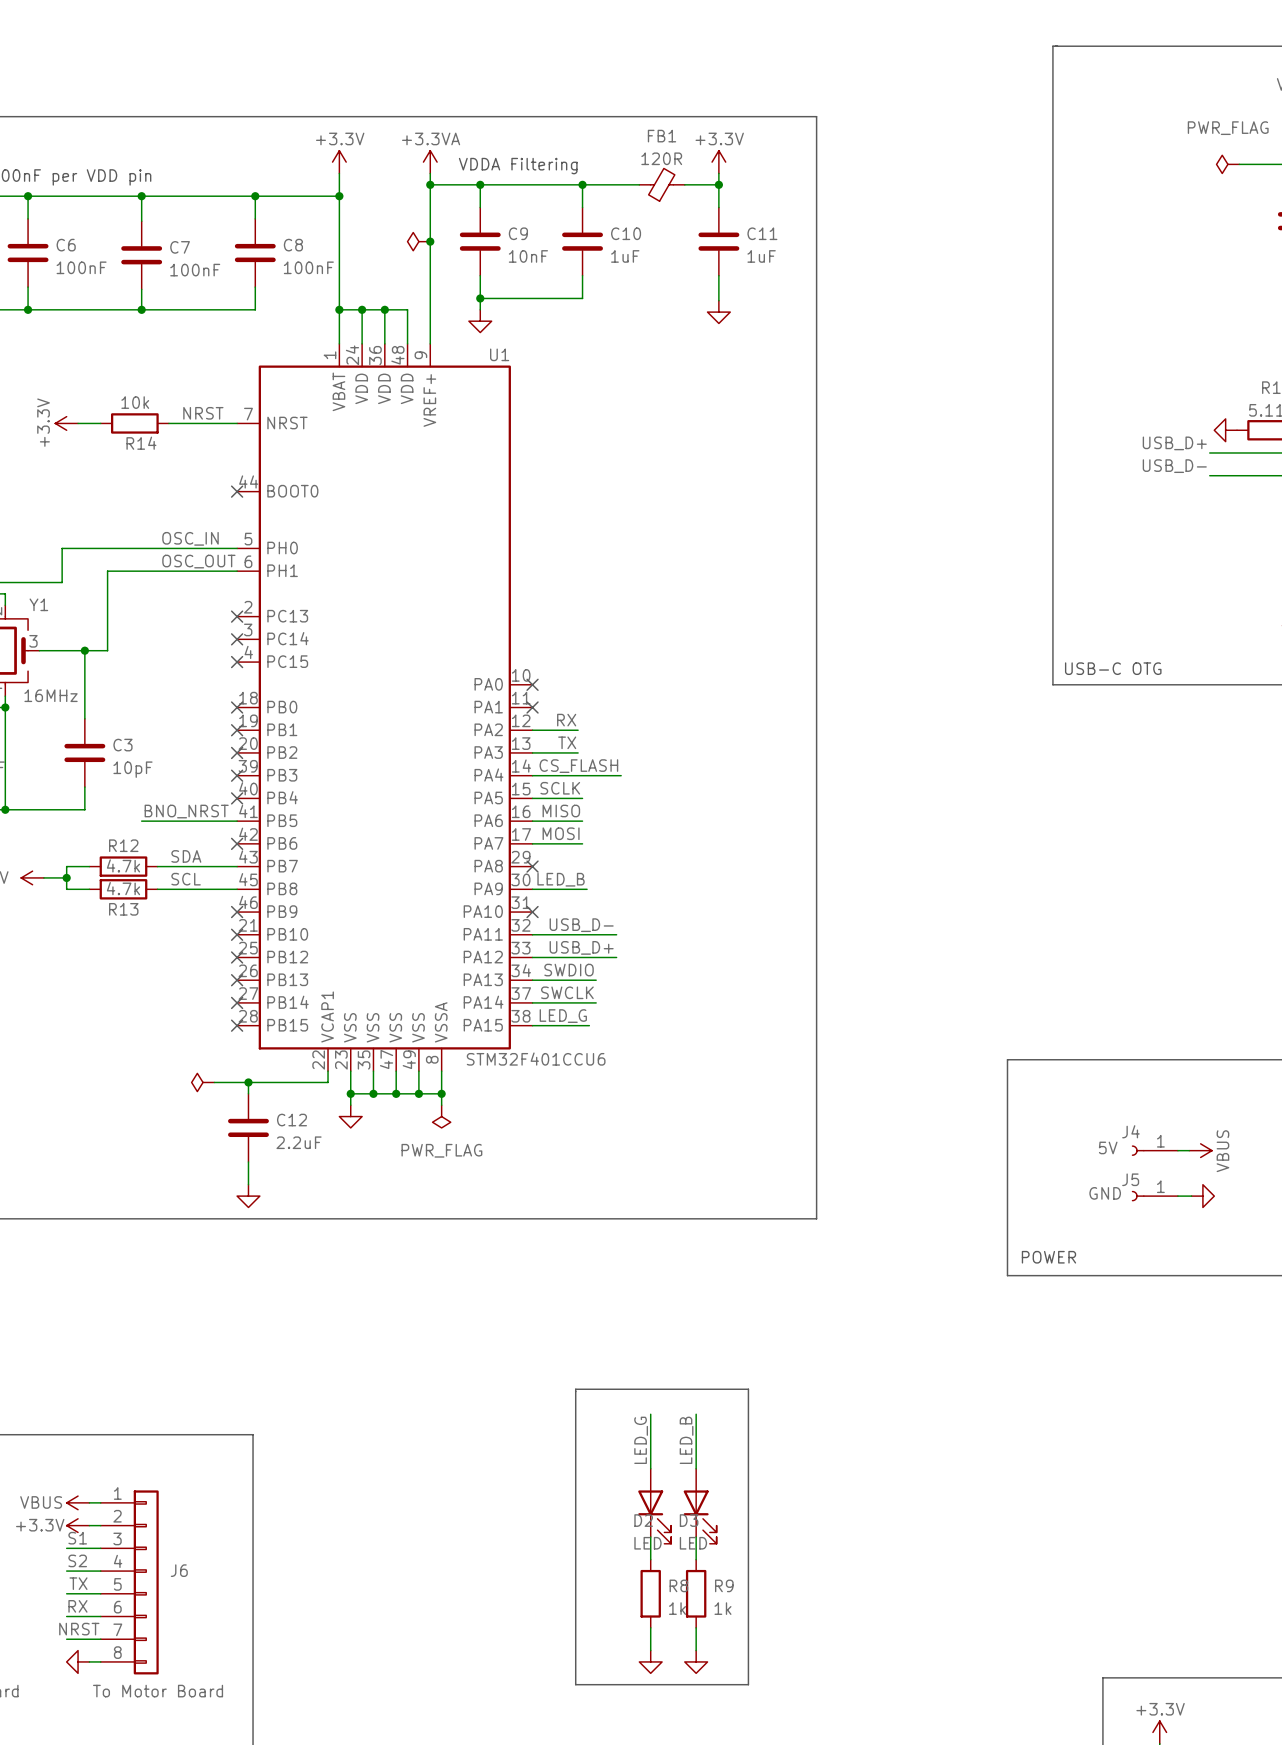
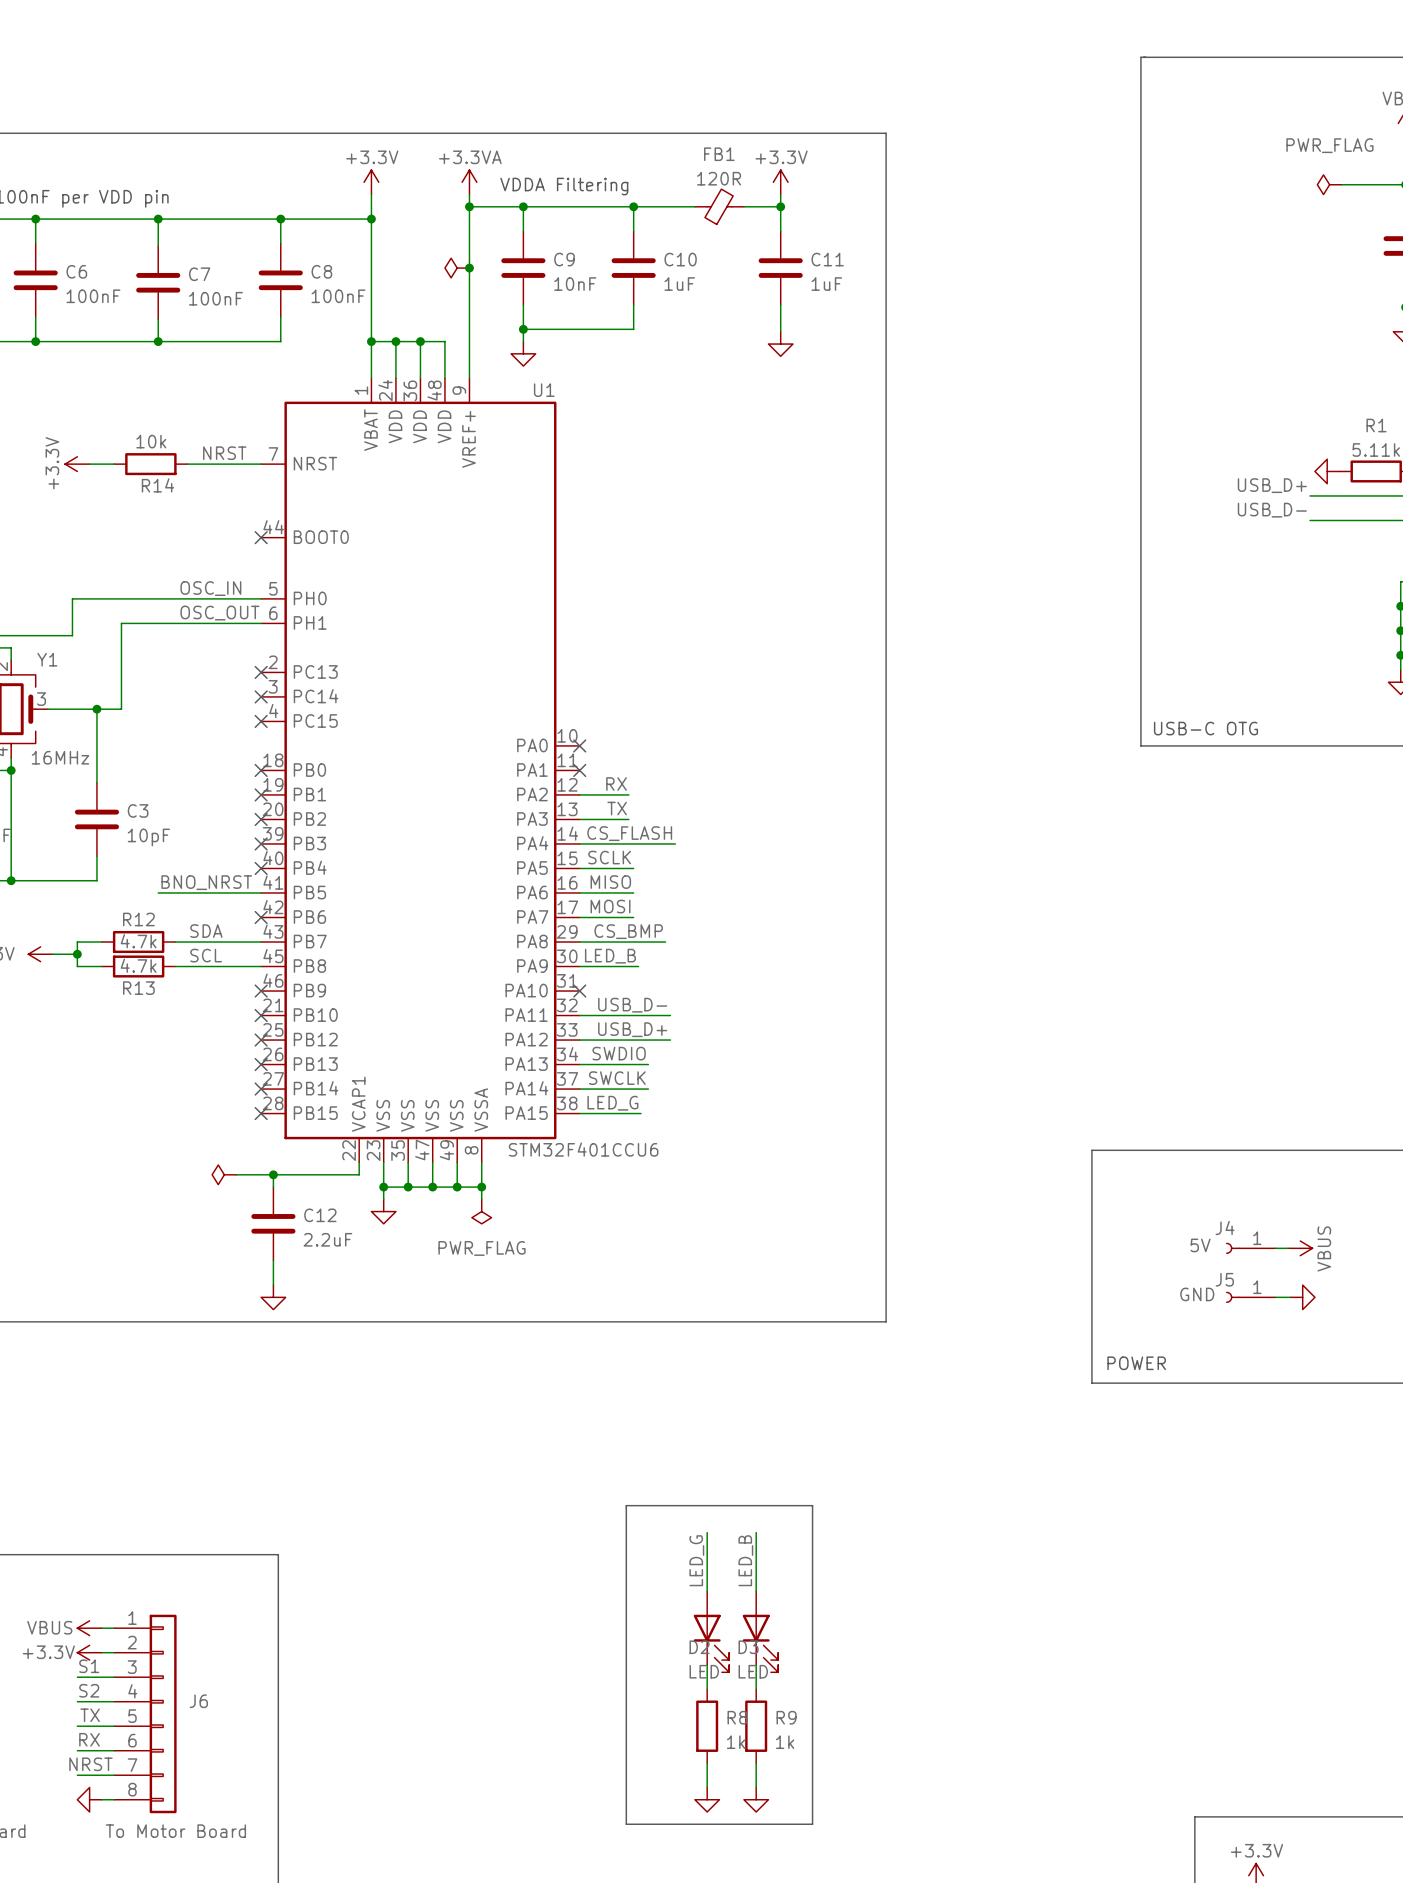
label: none -> CS_BMP (628, 931)
wire: none -> (579, 942) (665, 942)
no-connect mark: (532, 866) -> none

